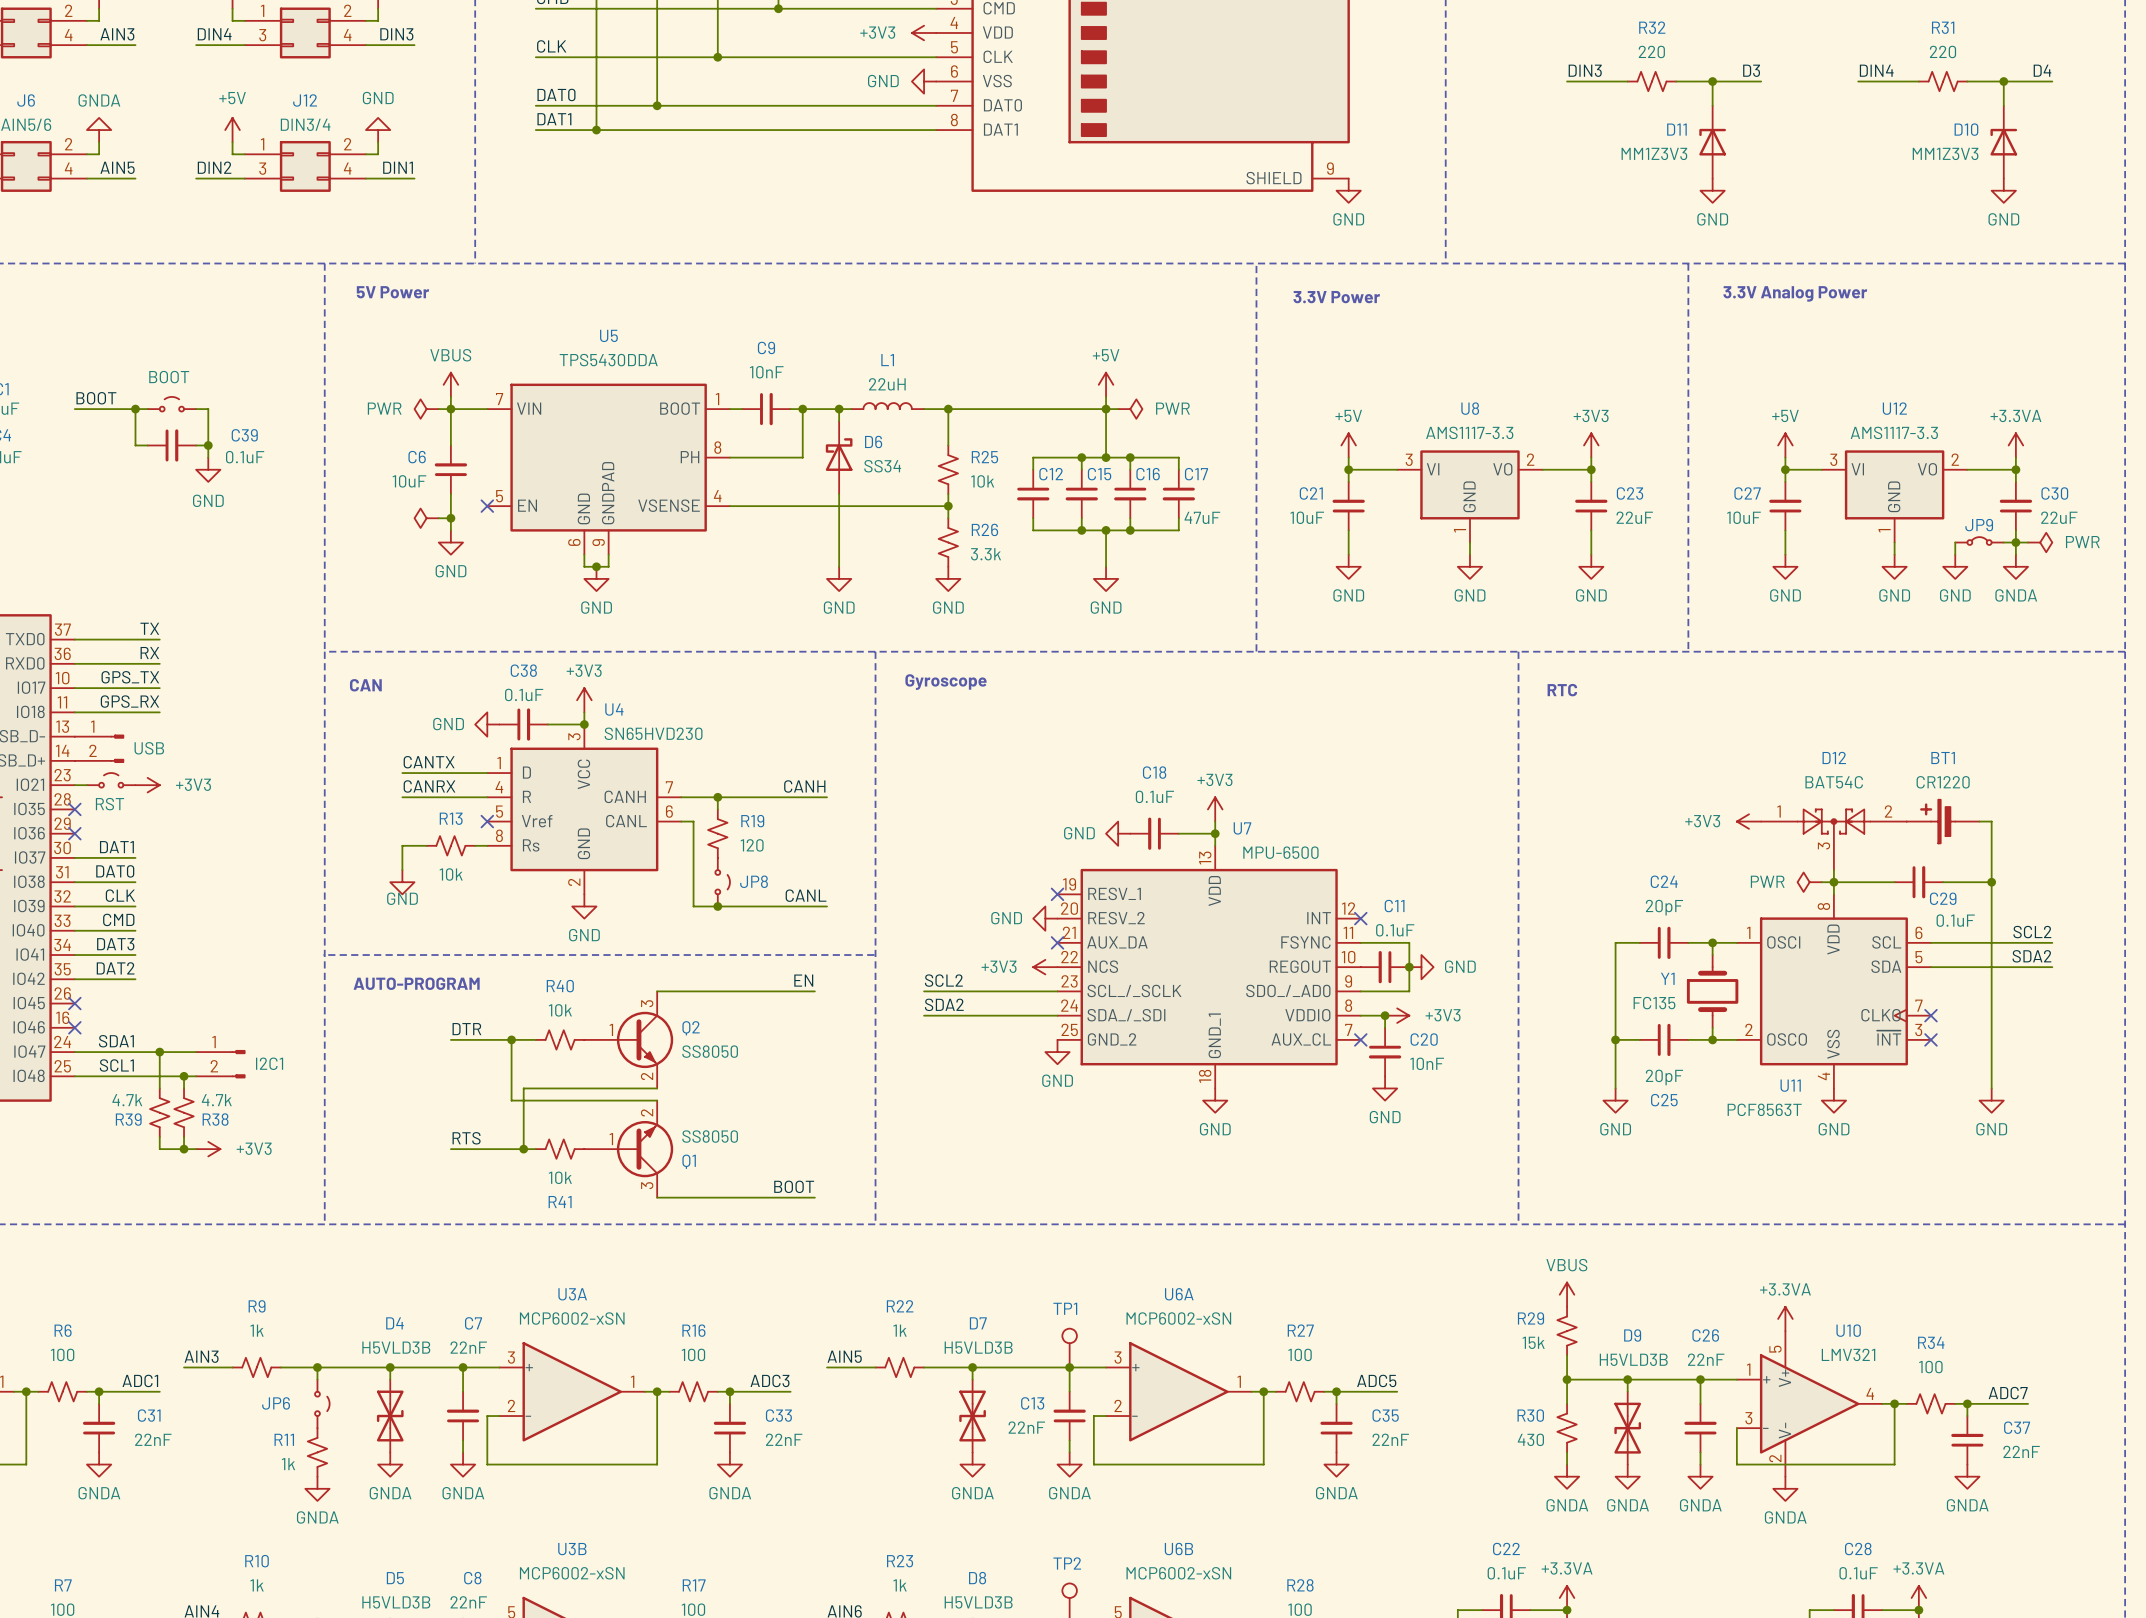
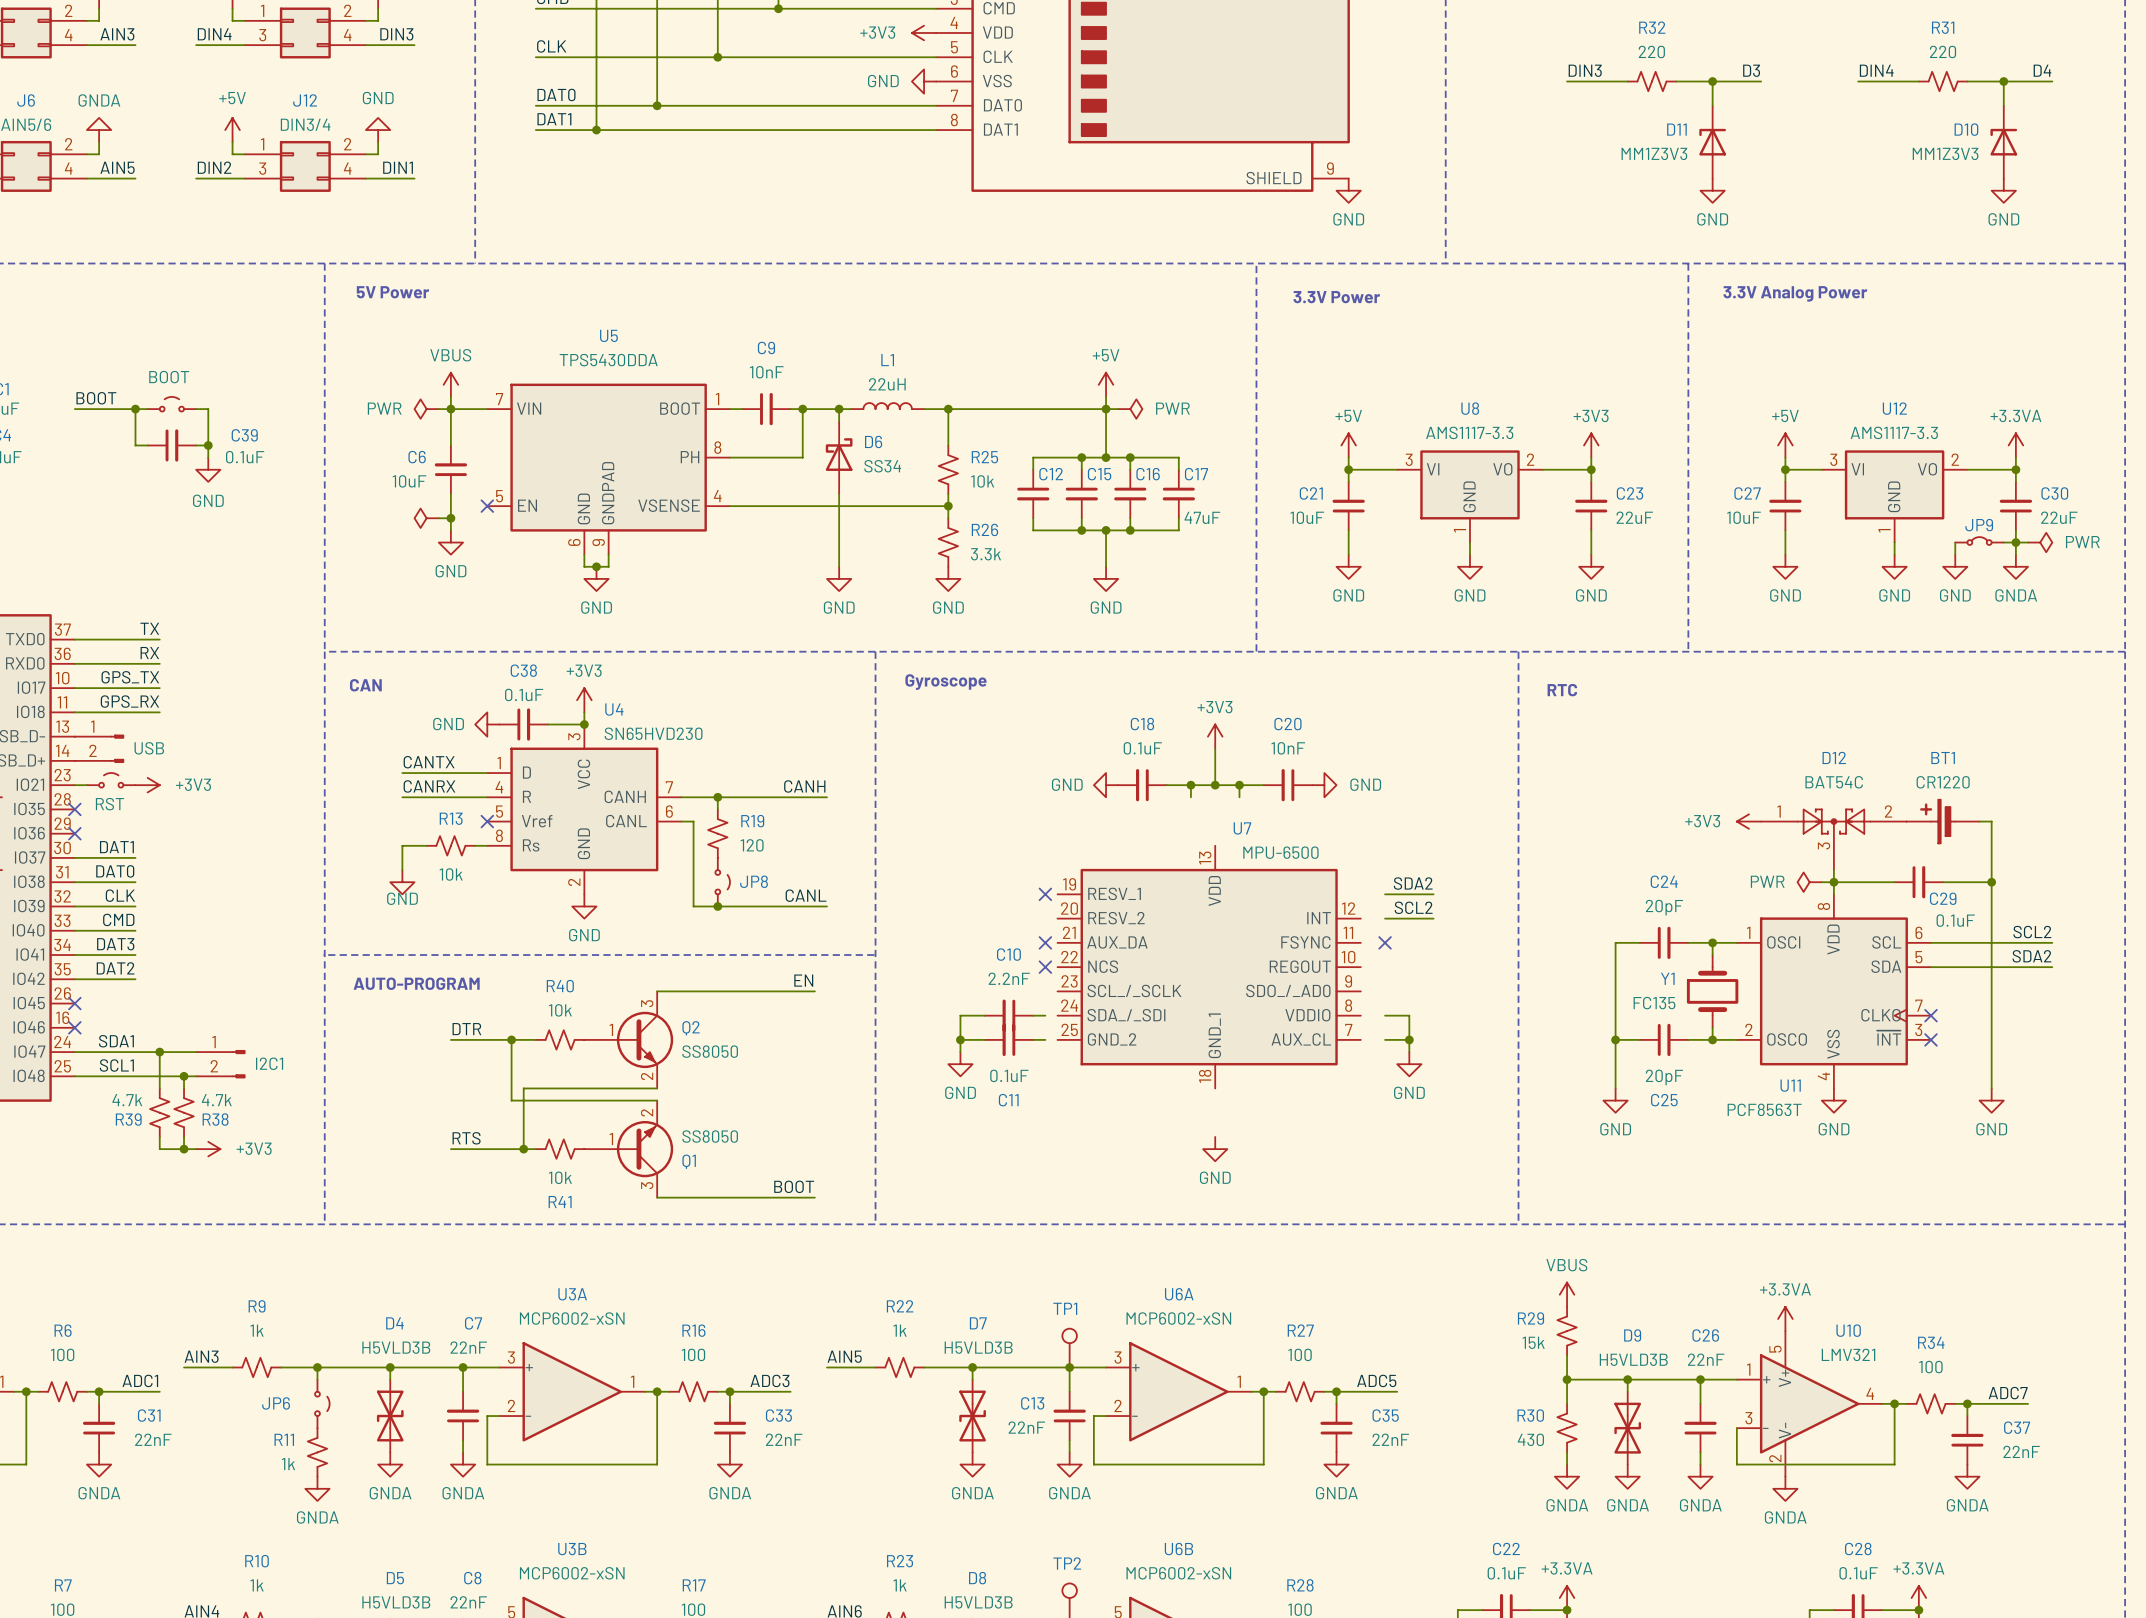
wire: none -> (1215, 748) (1215, 785)
wire: none -> (1166, 785) (1263, 785)
wire: none -> (1190, 785) (1190, 797)
junction: none -> (1190, 785)
junction: none -> (1215, 785)
wire: none -> (1239, 785) (1239, 797)
junction: none -> (1239, 785)
power symbol: none -> GND (1324, 785)
power symbol position: +3V3 (1215, 809) -> +3V3 (1215, 736)
wire: (1215, 821) (1215, 845) -> none
power symbol position: GND (1118, 833) -> GND (1106, 785)
C18 position: (1154, 833) -> (1142, 785)
wire: (1178, 833) (1215, 833) -> none
junction: (1215, 833) -> none
label: none -> SDA2 (1413, 883)
no-connect mark position: (1057, 894) -> (1045, 894)
wire: none -> (1385, 894) (1433, 894)
C11 name position: C11 (1394, 906) -> C11 (1008, 1100)
label: none -> SCL2 (1413, 907)
power symbol: GND (1045, 918) -> none
no-connect mark position: (1360, 918) -> (1385, 942)
wire: none -> (1385, 918) (1433, 918)
C11 value position: 0.1uF (1395, 930) -> 0.1uF (1009, 1075)
no-connect mark position: (1057, 942) -> (1045, 942)
wire: (1360, 942) (1409, 942) (1409, 991) (1360, 991) -> none
no-connect mark: none -> (1045, 967)
power symbol: +3V3 (1045, 967) -> none
C11 position: (1385, 967) -> (1008, 1039)
junction: (1409, 967) -> none
power symbol: GND (1421, 967) -> none
label: SCL2 (943, 980) -> none
wire: (924, 991) (1057, 991) -> none
label: SDA2 (944, 1004) -> none
wire: (924, 1015) (960, 1015) -> (960, 1052) (960, 1015)
C10: none -> 2.2nF (1008, 1015)
wire: (1045, 1015) (1057, 1015) -> (1033, 1039) (1045, 1039)
wire: (1360, 1015) (1385, 1015) (1385, 1027) -> none
wire: none -> (1385, 1015) (1409, 1015) (1409, 1052)
junction position: (1385, 1015) -> (1409, 1039)
power symbol: +3V3 (1397, 1015) -> none
wire: none -> (960, 1039) (984, 1039)
junction: none -> (960, 1039)
no-connect mark: (1360, 1039) -> none
wire: none -> (1385, 1039) (1409, 1039)
C20 name position: C20 (1424, 1039) -> C20 (1287, 724)
power symbol: GND (1057, 1052) -> none
C20 rotation: 0° (1385, 1052) -> 90° clockwise (1287, 785)
C20 position: (1385, 1052) -> (1288, 785)
C20 value position: 10nF (1427, 1063) -> 10nF (1288, 748)
power symbol: none -> GND (960, 1064)
power symbol position: GND (1385, 1088) -> GND (1409, 1064)
power symbol position: GND (1215, 1100) -> GND (1215, 1149)

